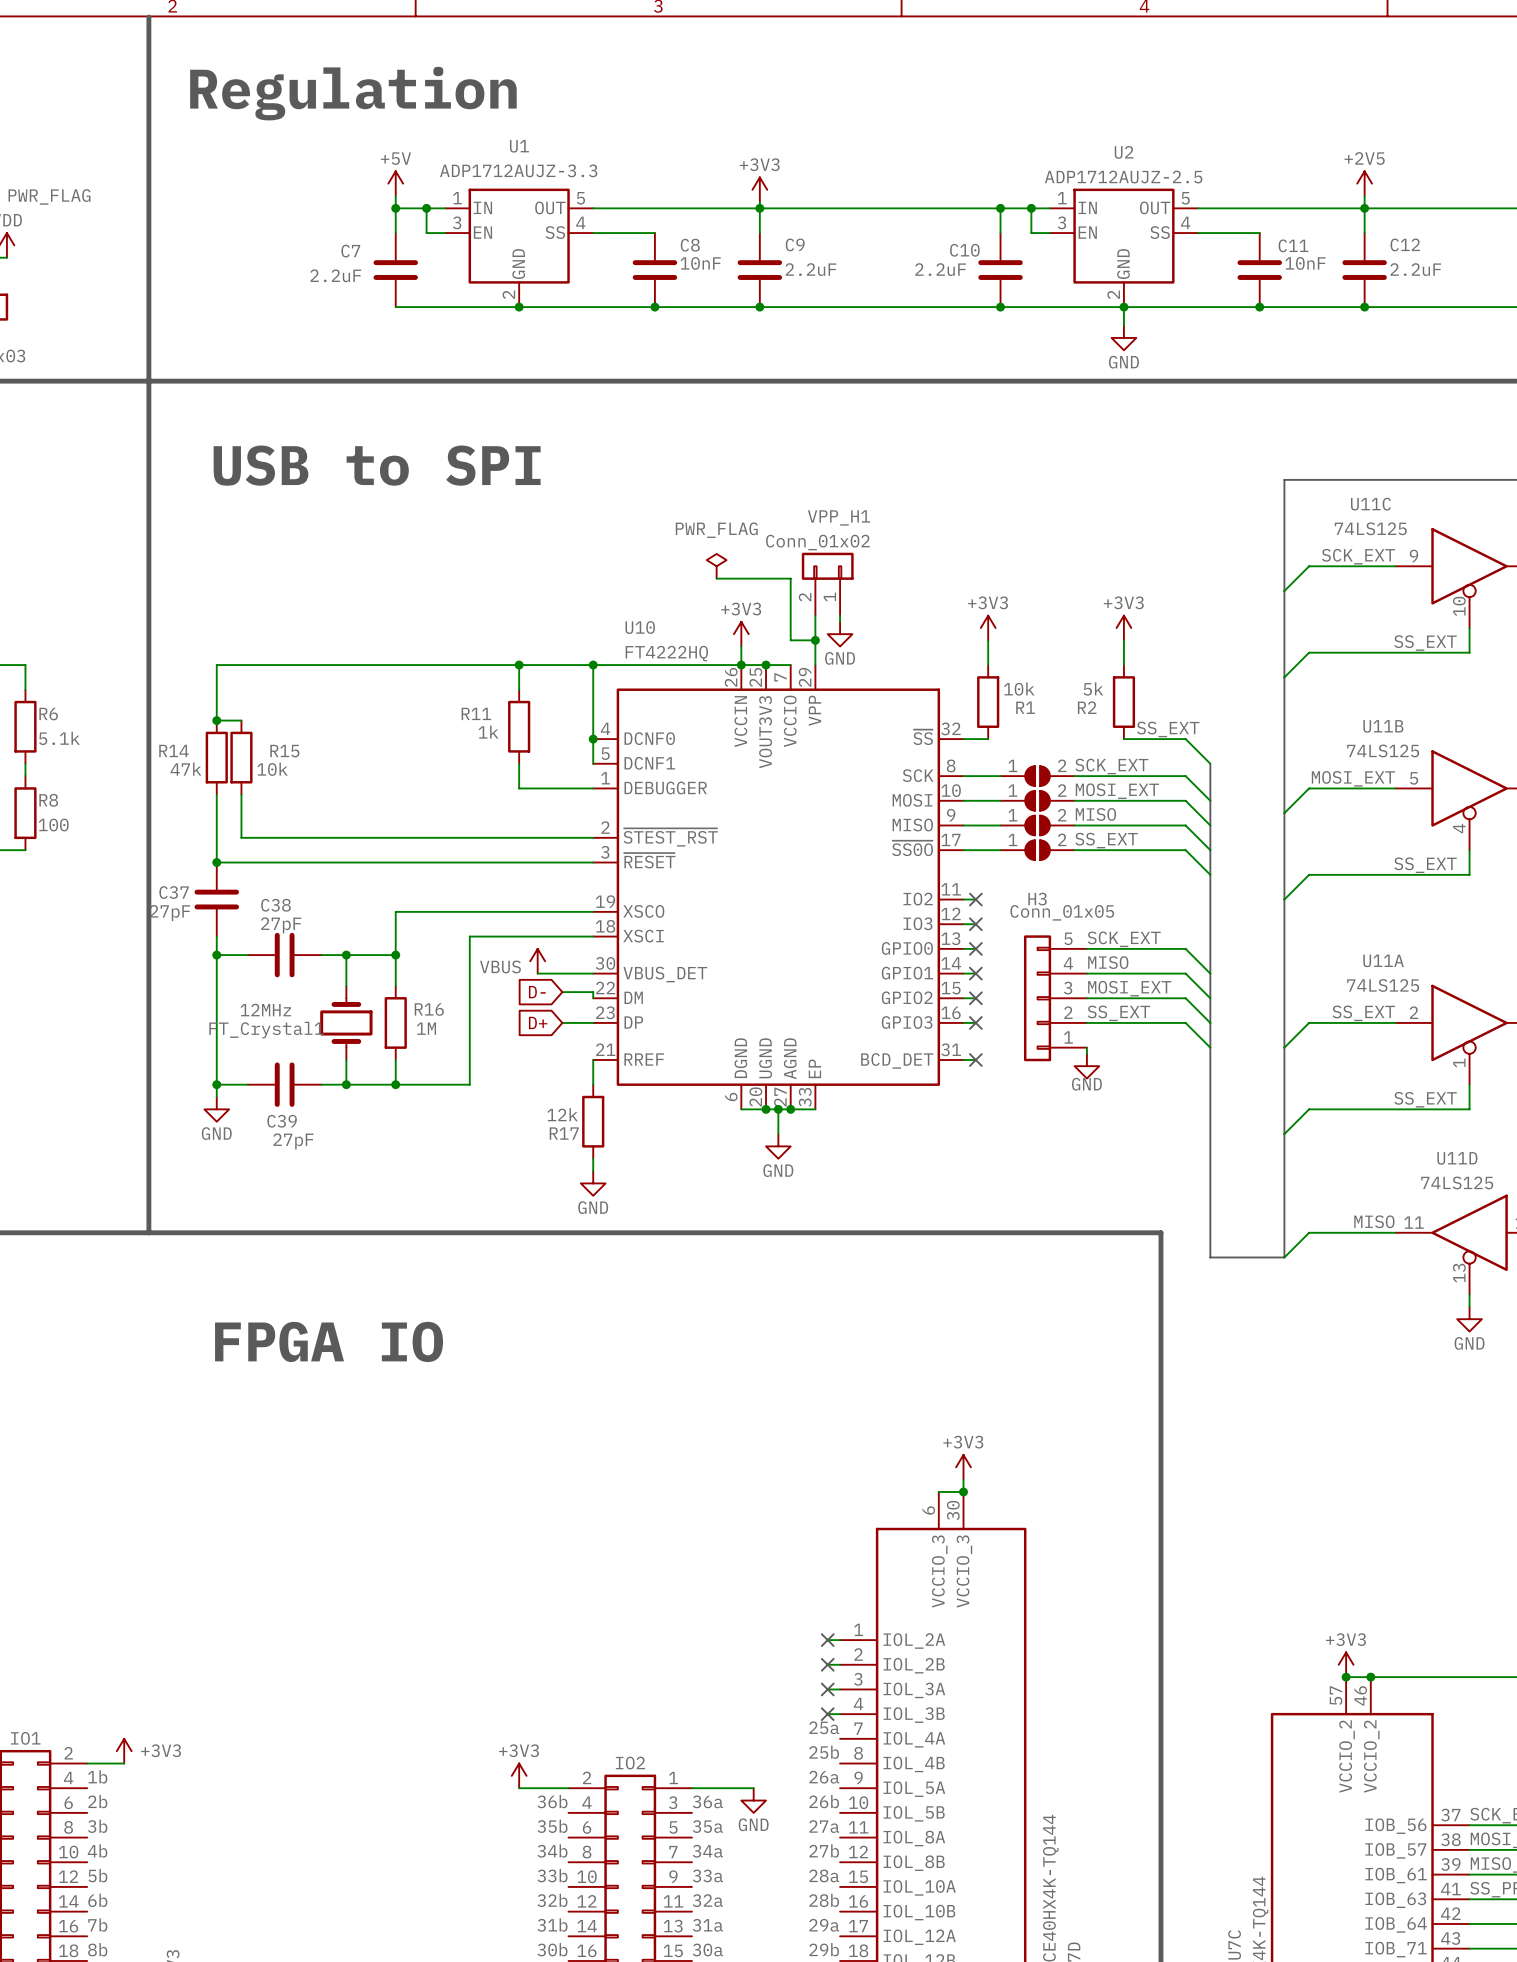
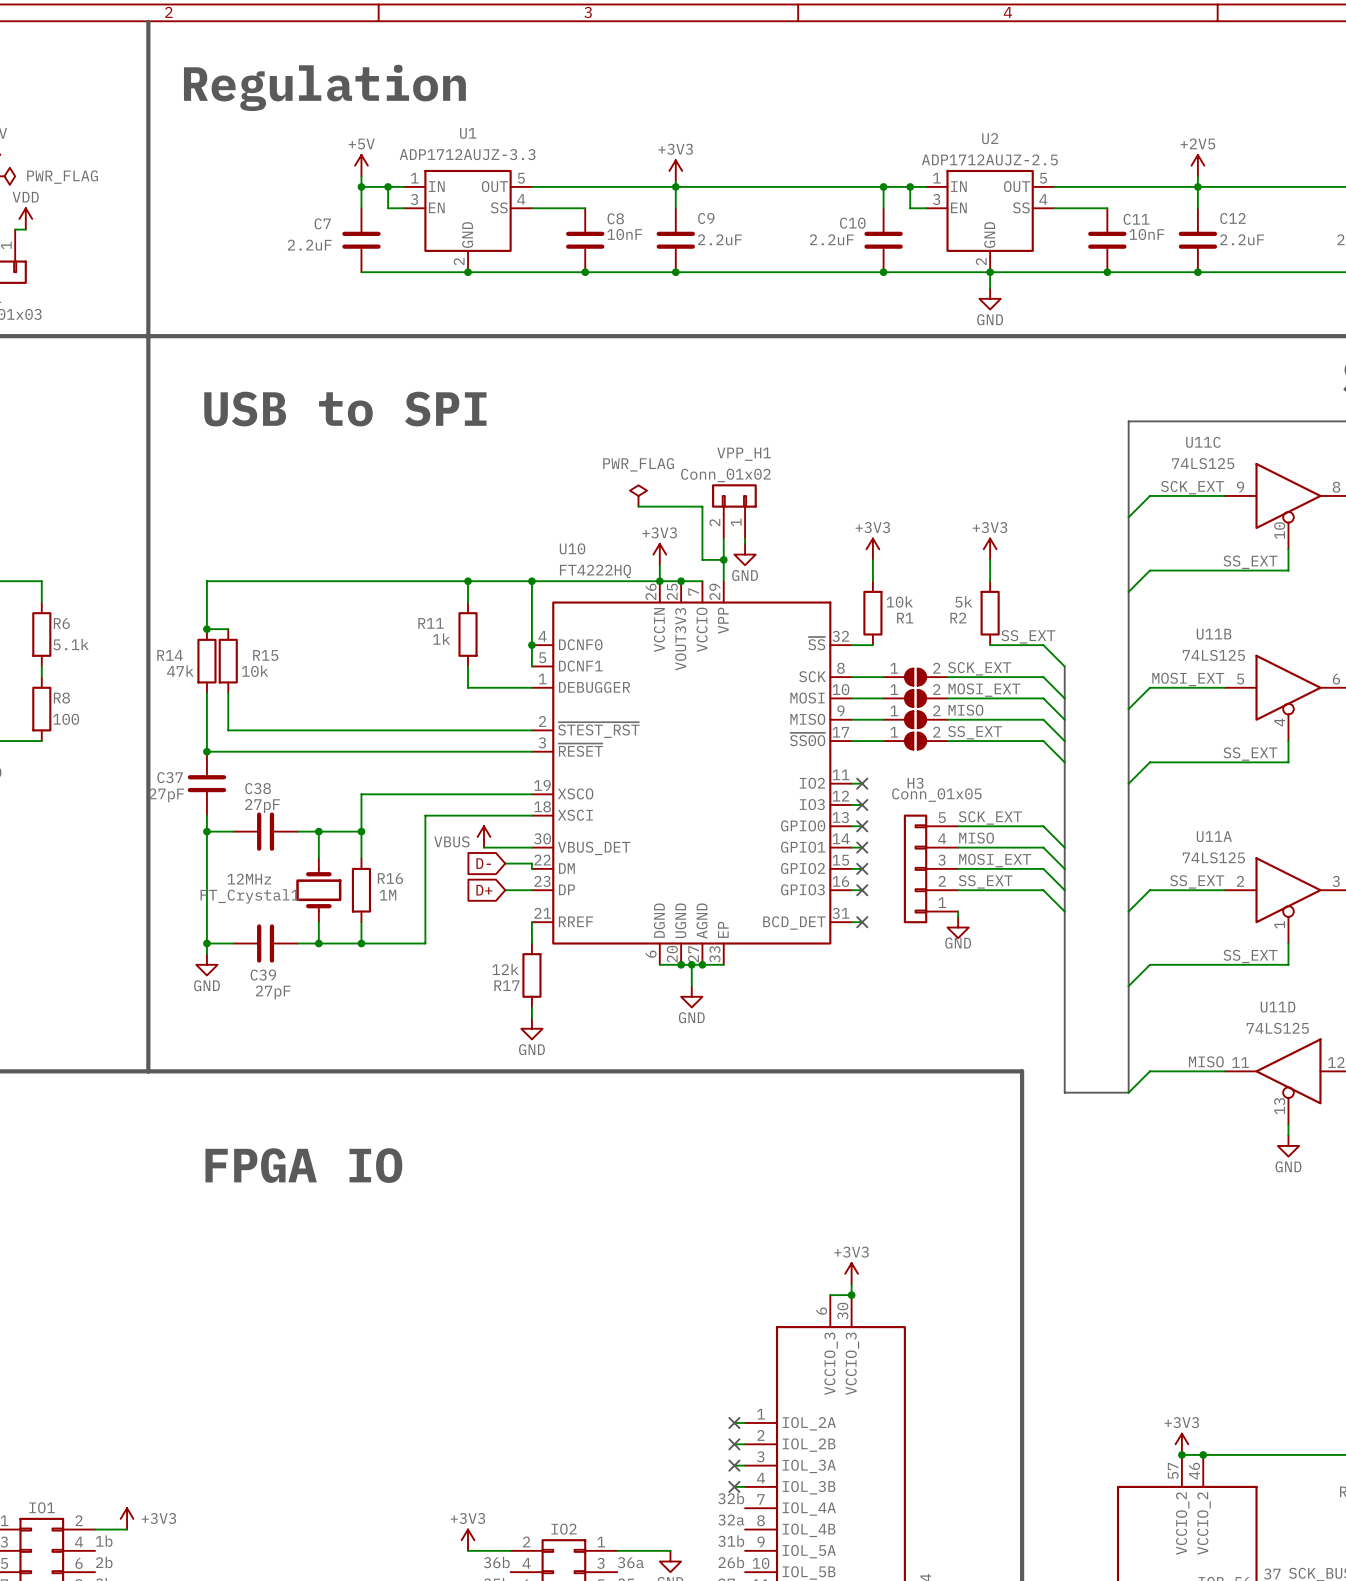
label: 25a (824, 1727) -> 32b (731, 1498)
label: 25b (824, 1752) -> 32a (731, 1520)
label: 26a (824, 1777) -> 31b (731, 1541)

